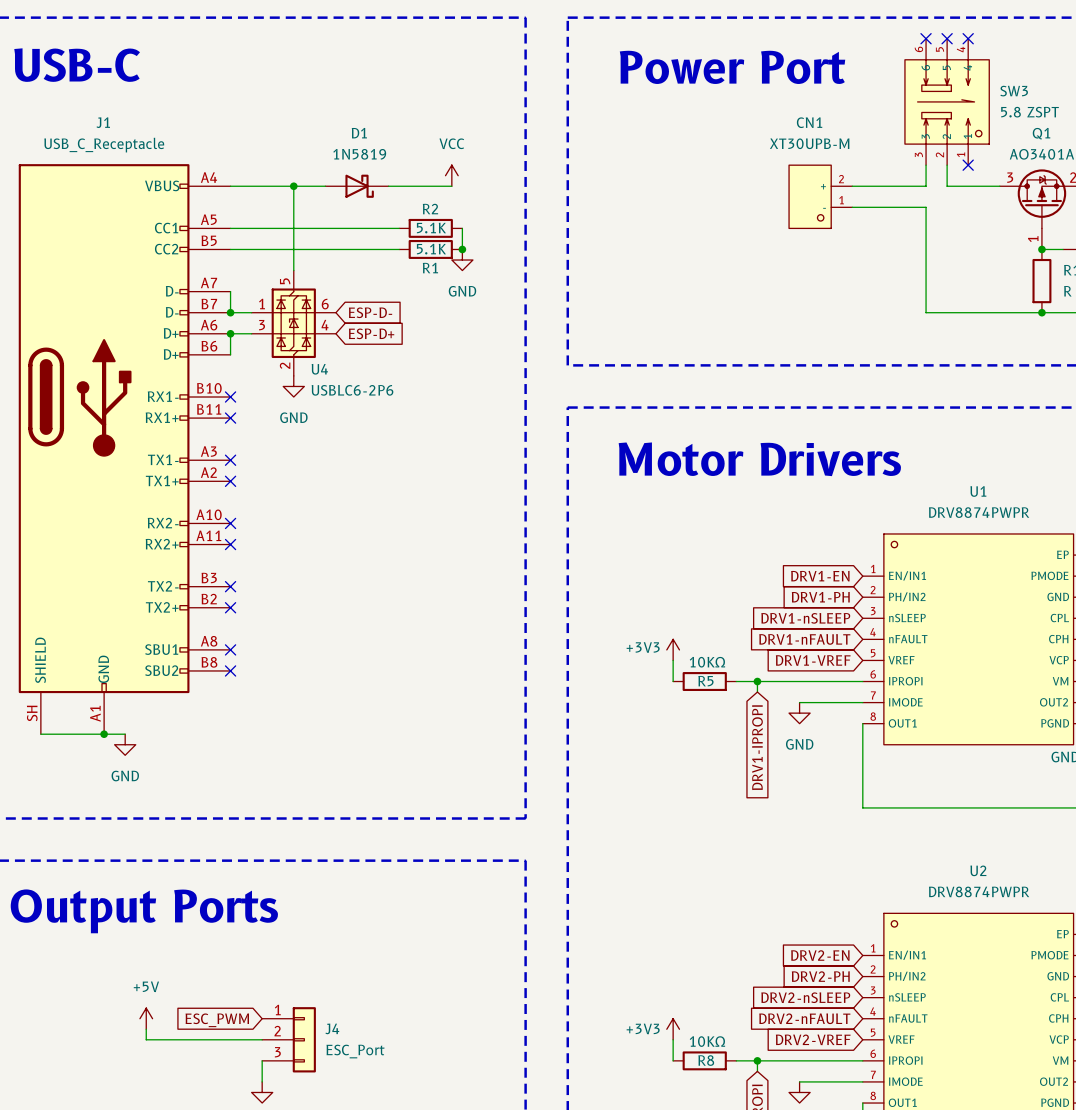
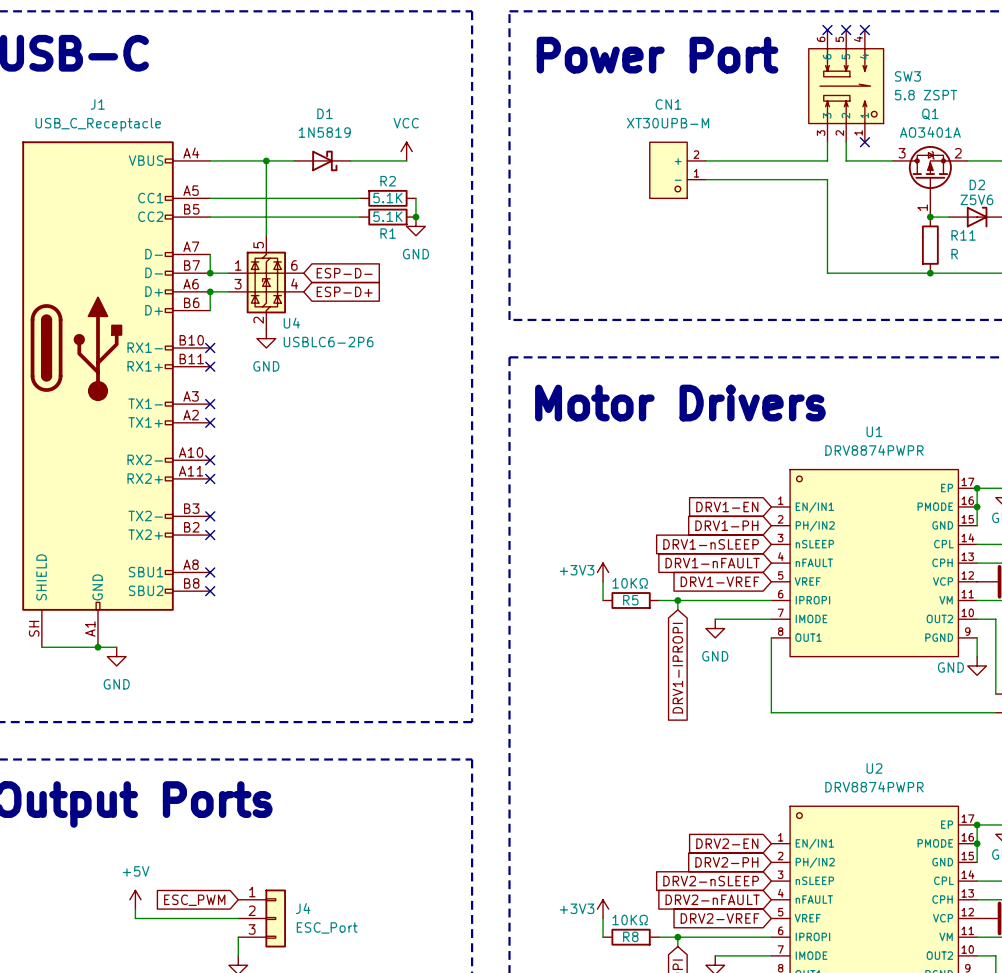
CN1 position: (820, 196) -> (677, 170)

